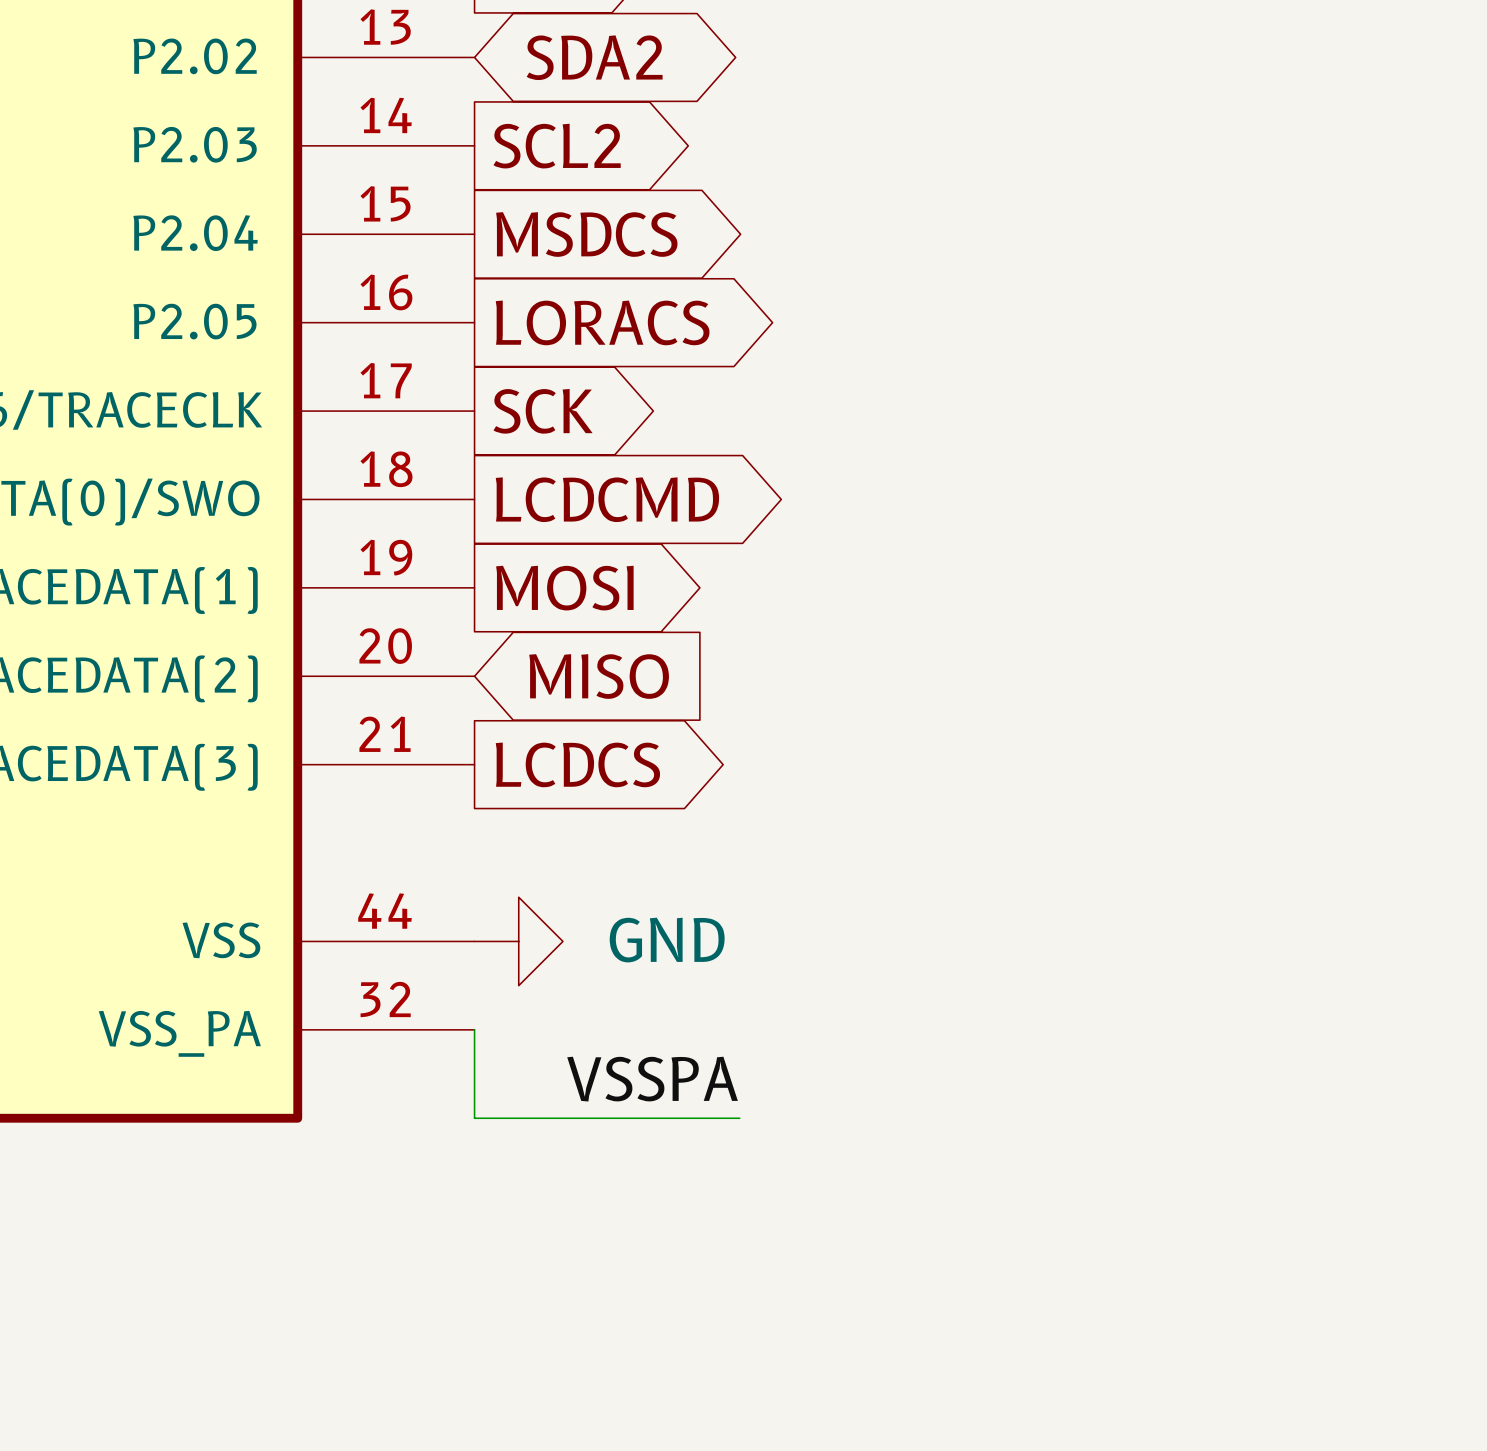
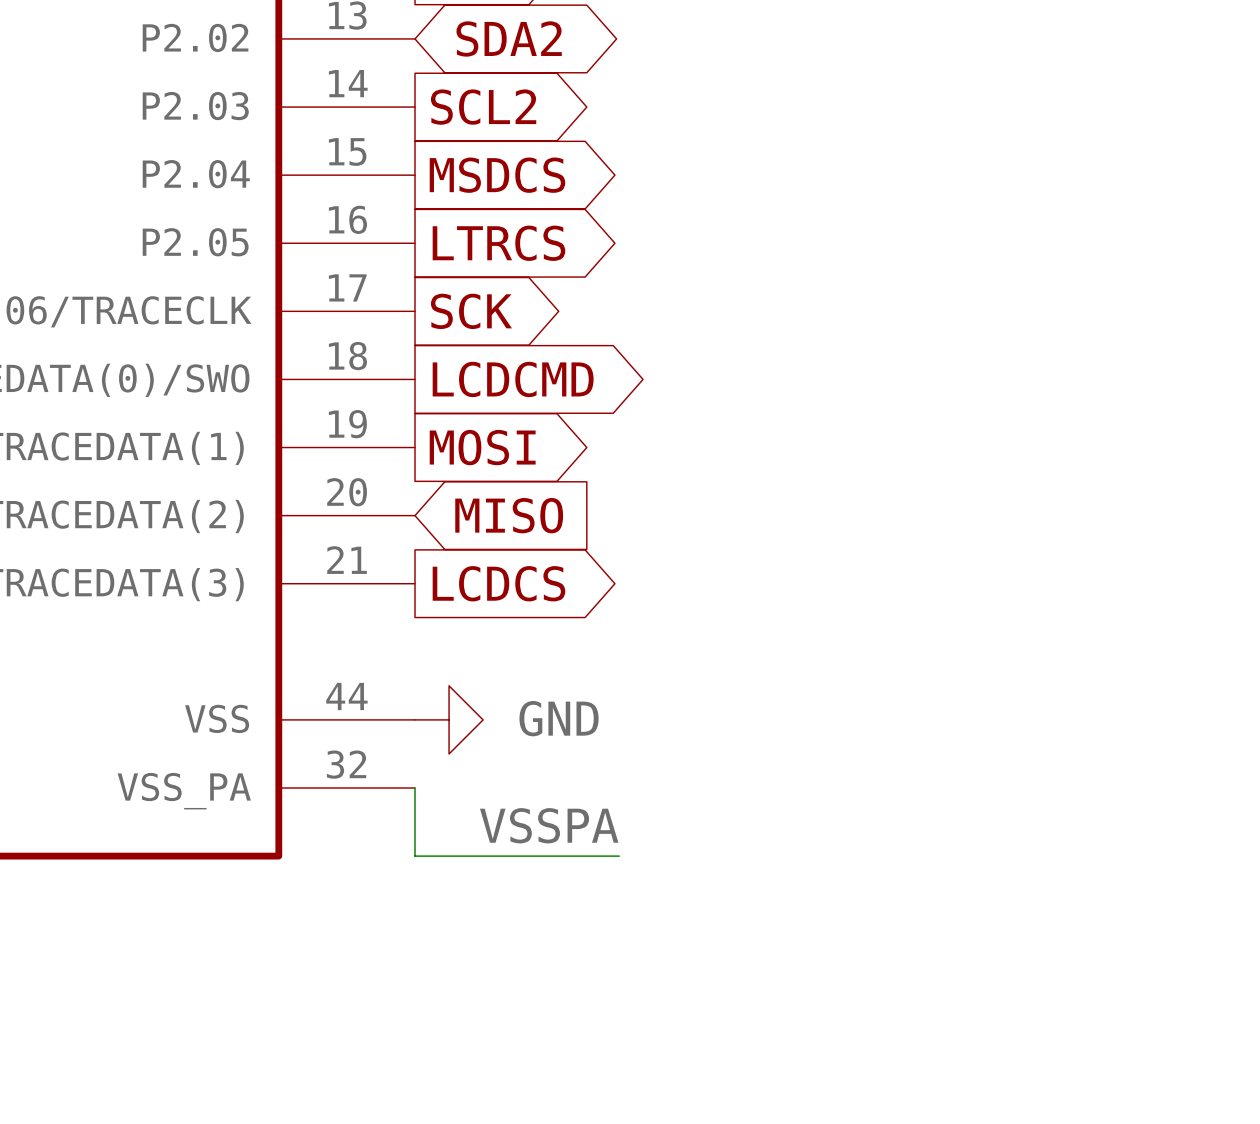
global label: LORACS (602, 322) -> LTRCS (498, 243)

